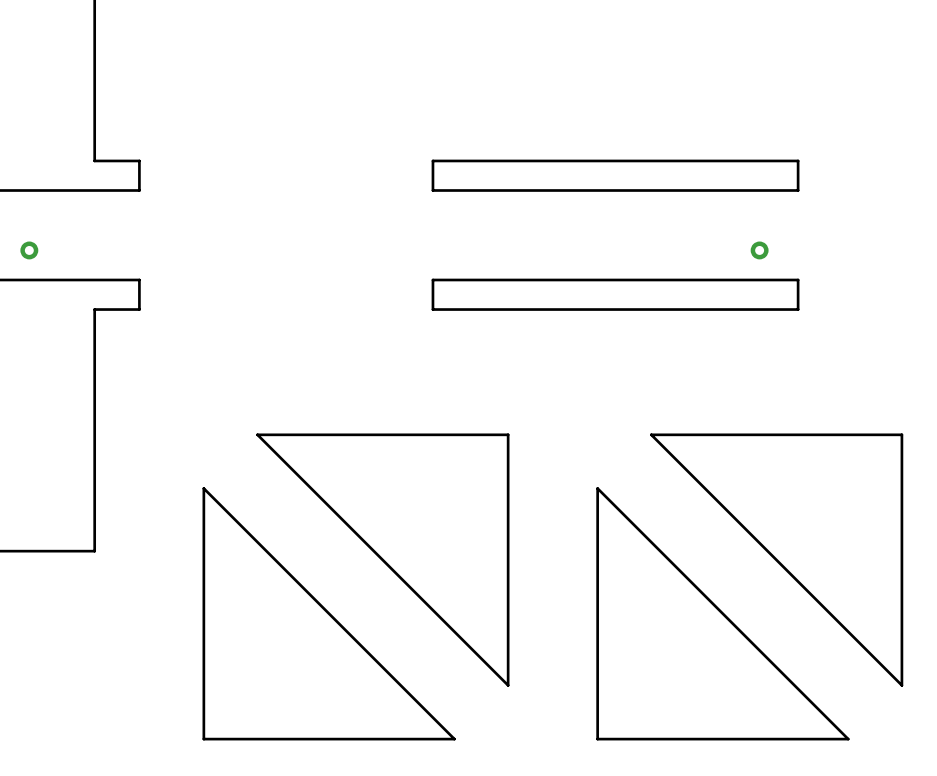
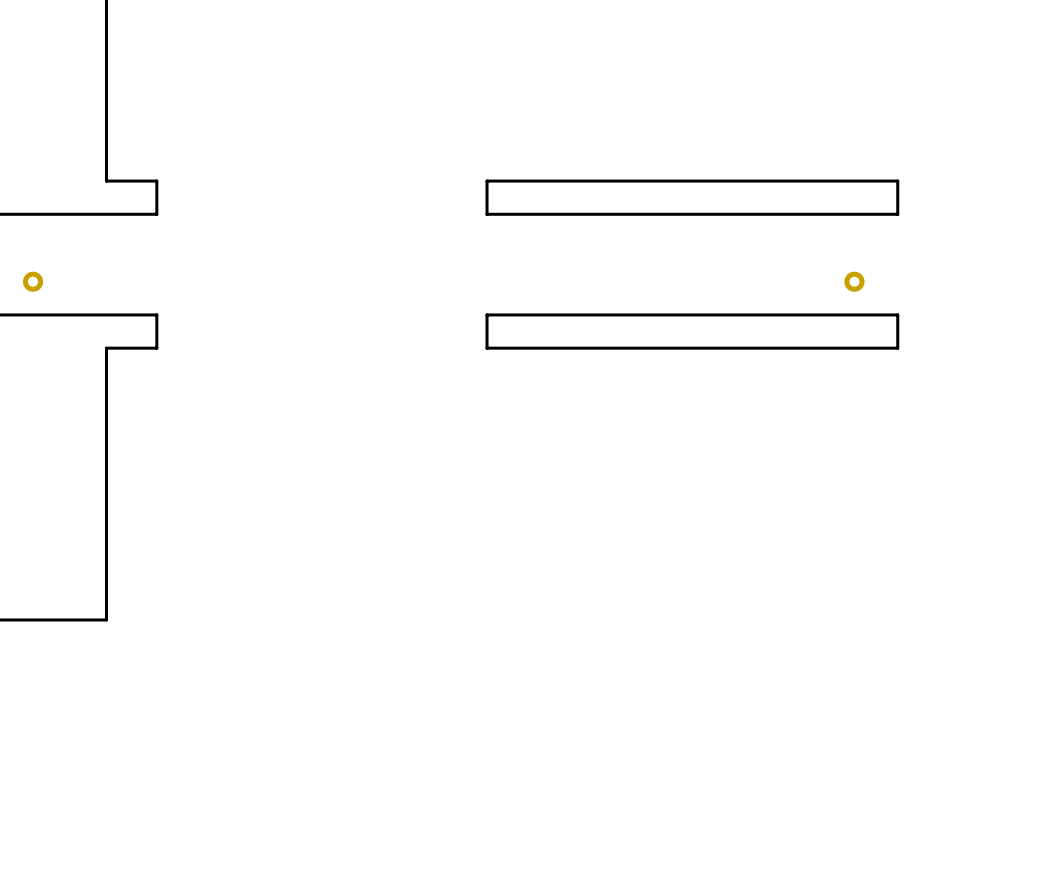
board edge: (508, 434) (257, 434) (508, 685) (508, 434) -> none
board edge: (901, 434) (651, 434) (901, 685) (901, 434) -> none
board edge: (203, 488) (203, 739) (454, 739) (203, 488) -> none
board edge: (597, 488) (848, 739) (597, 739) (597, 488) -> none

